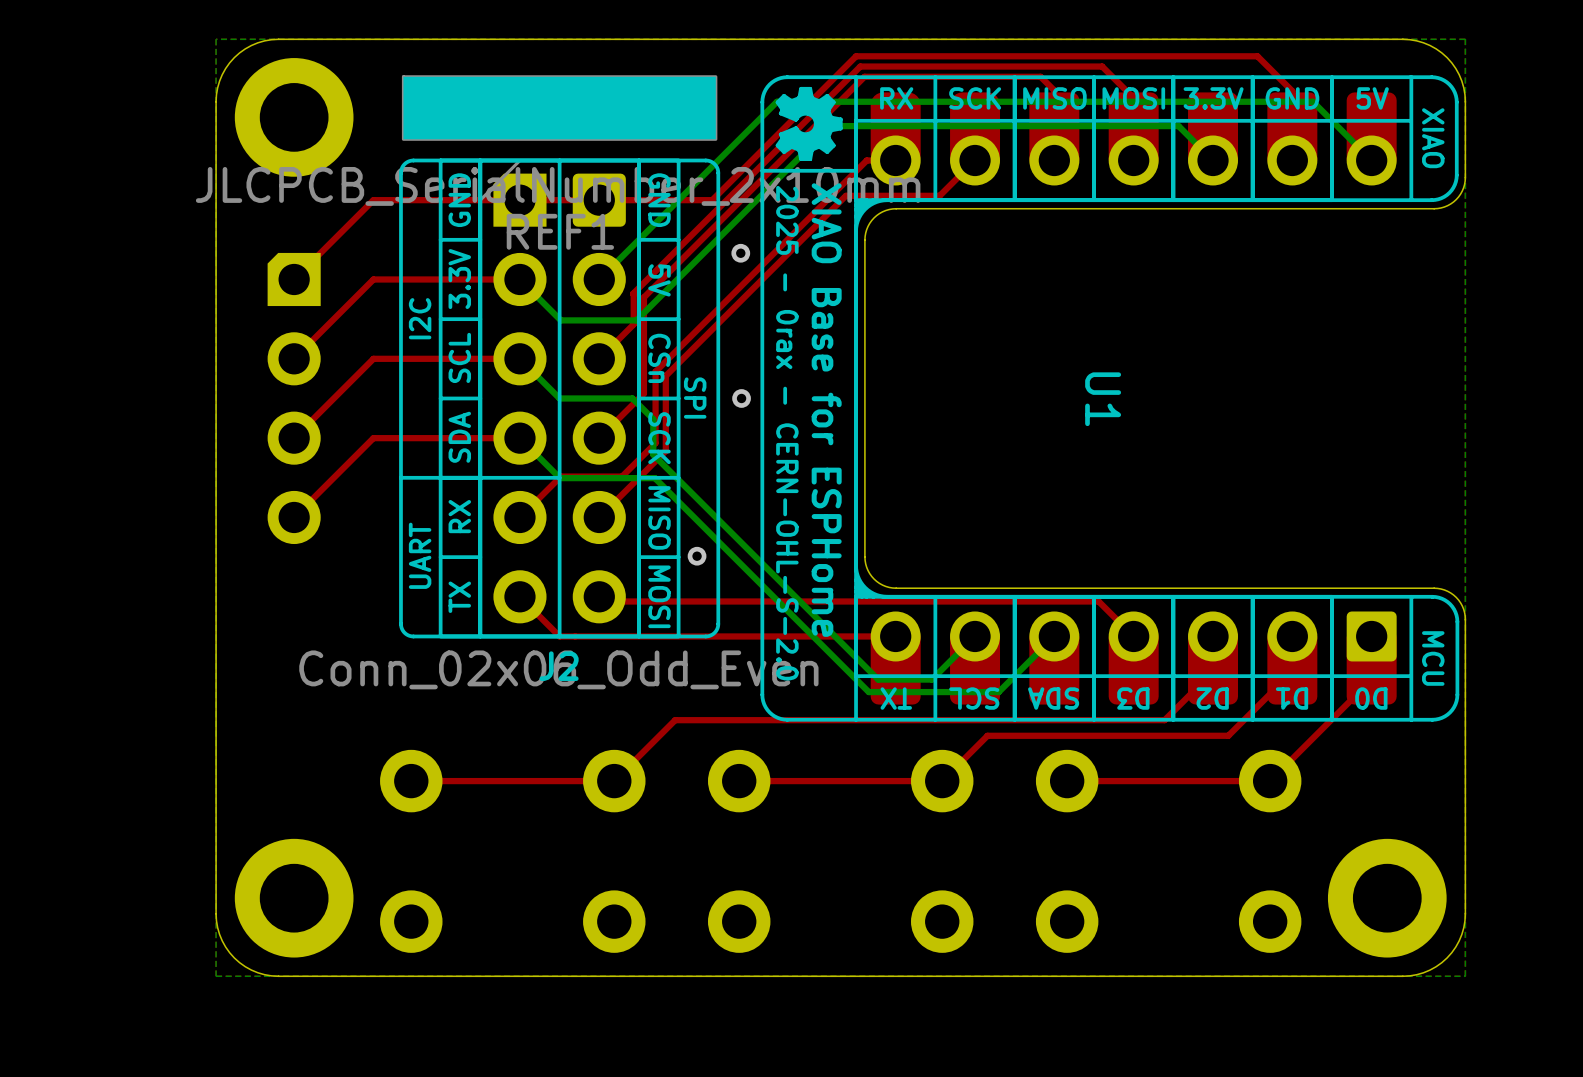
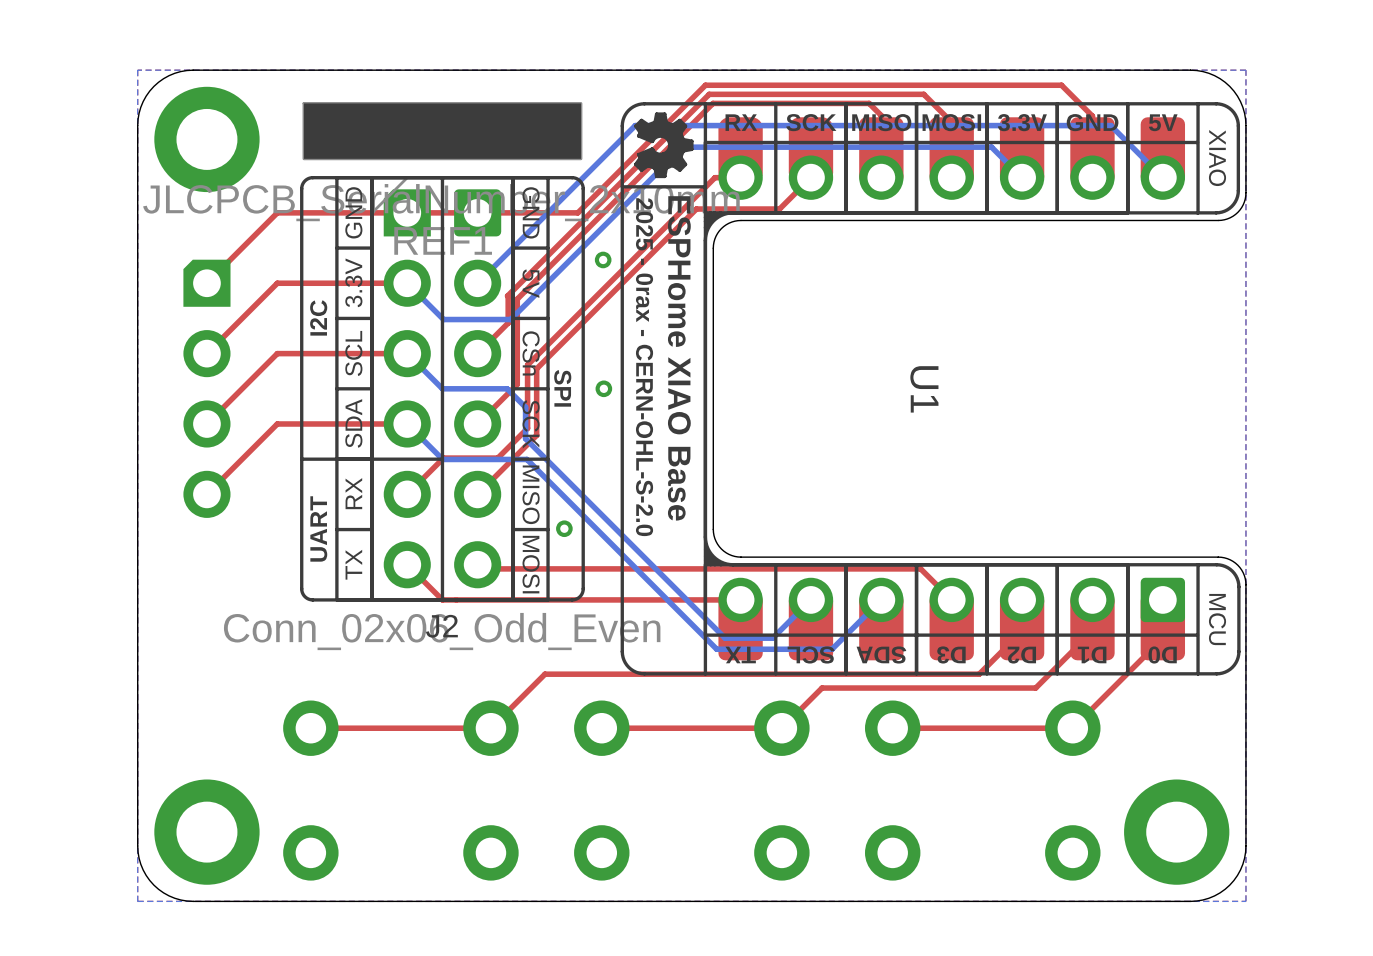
text: XIAO Base for ESPHome (826, 410) -> ESPHome XIAO Base (679, 358)

